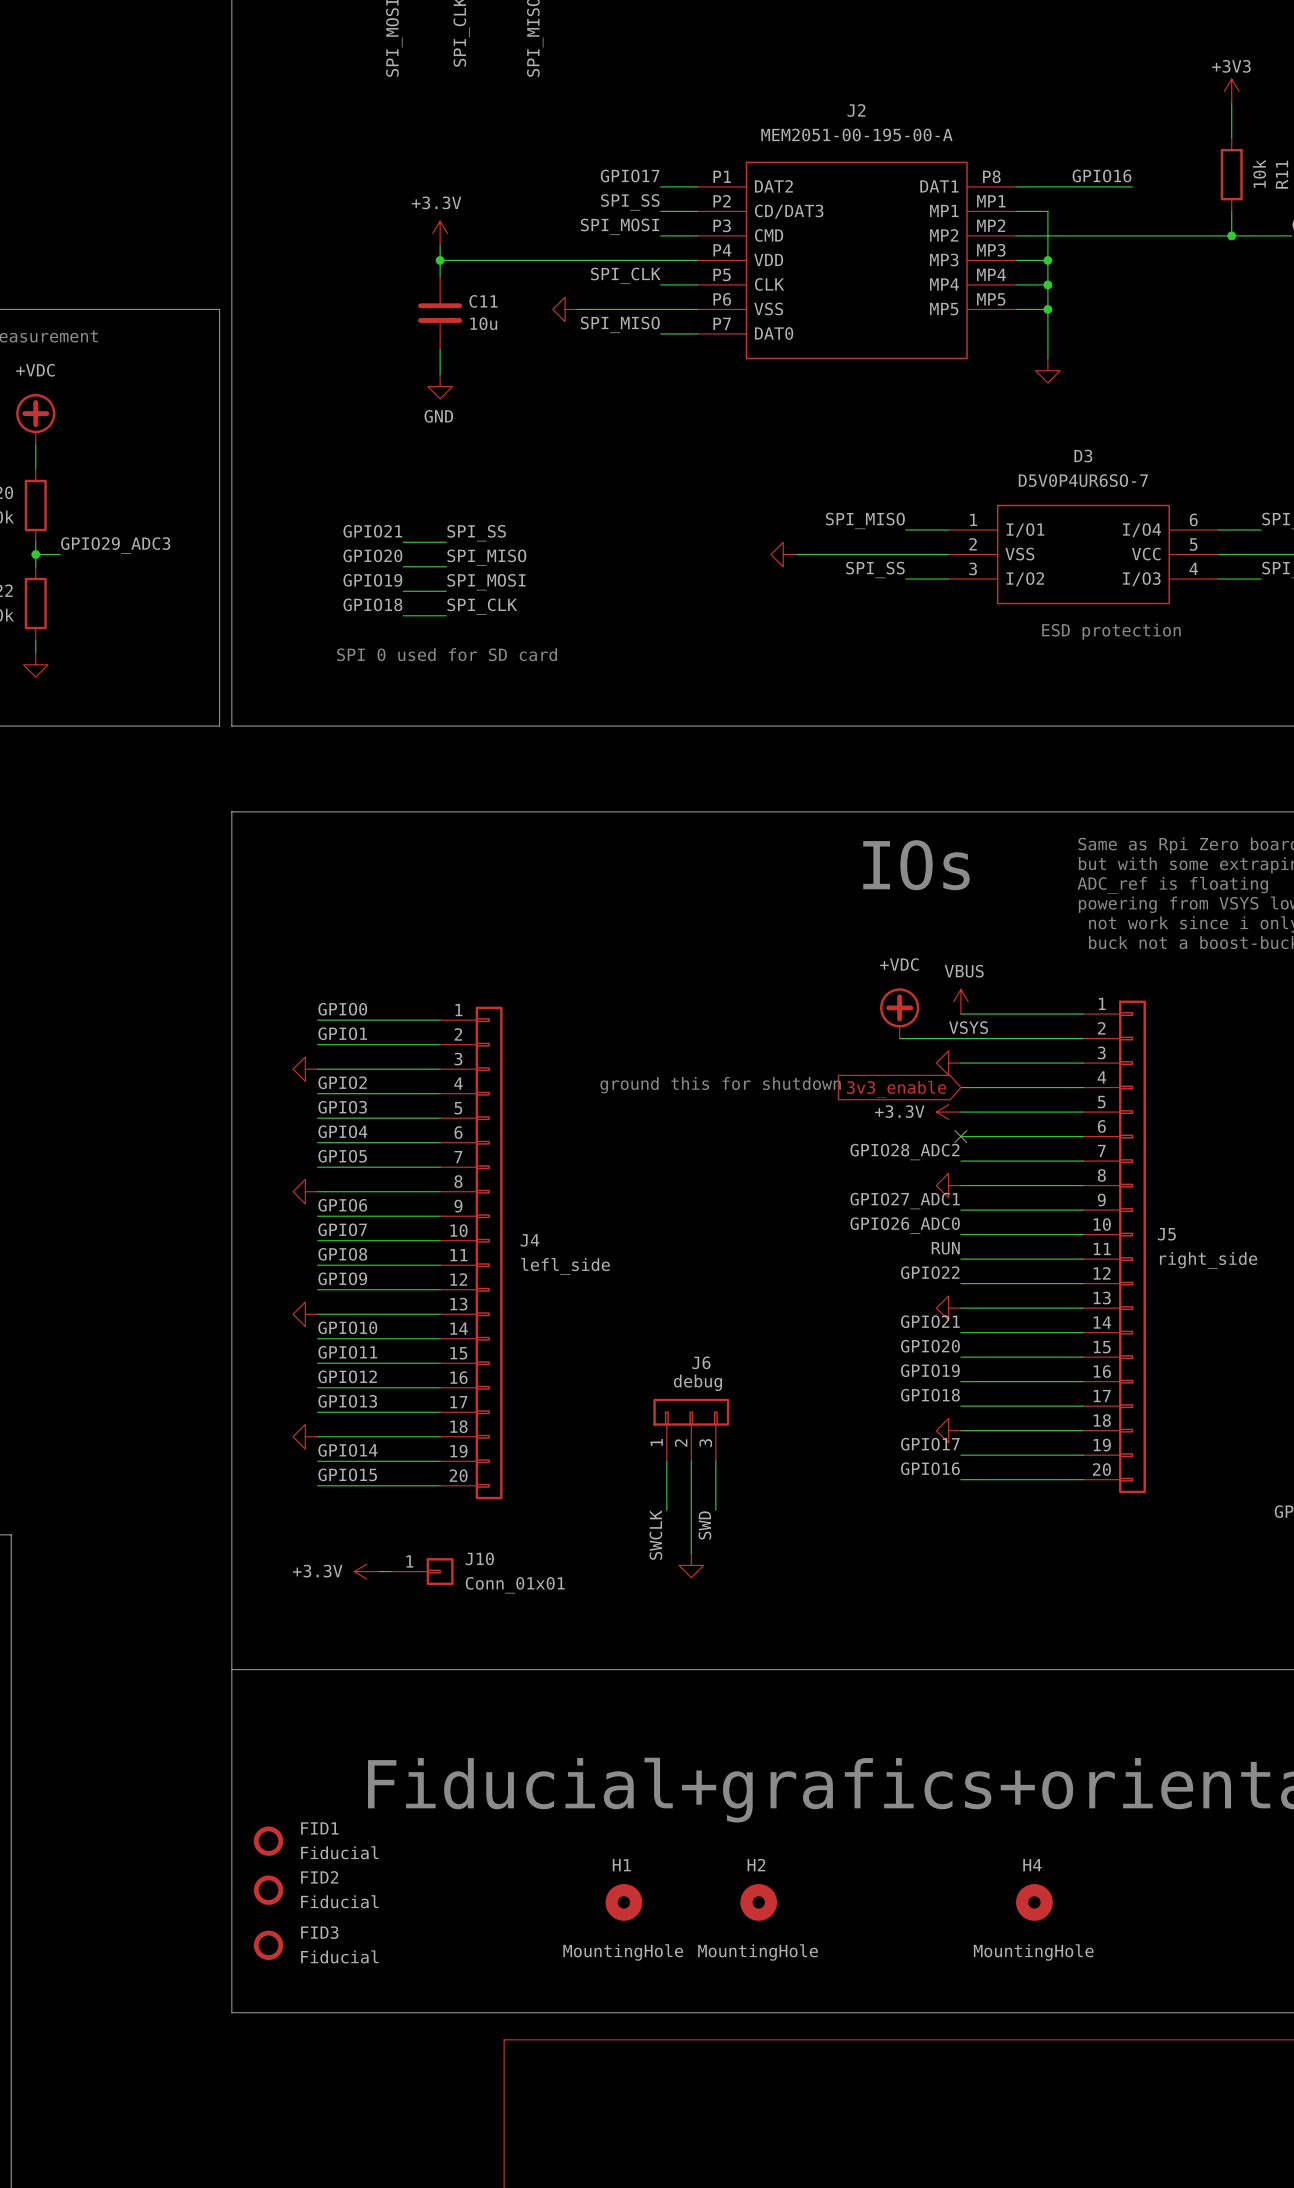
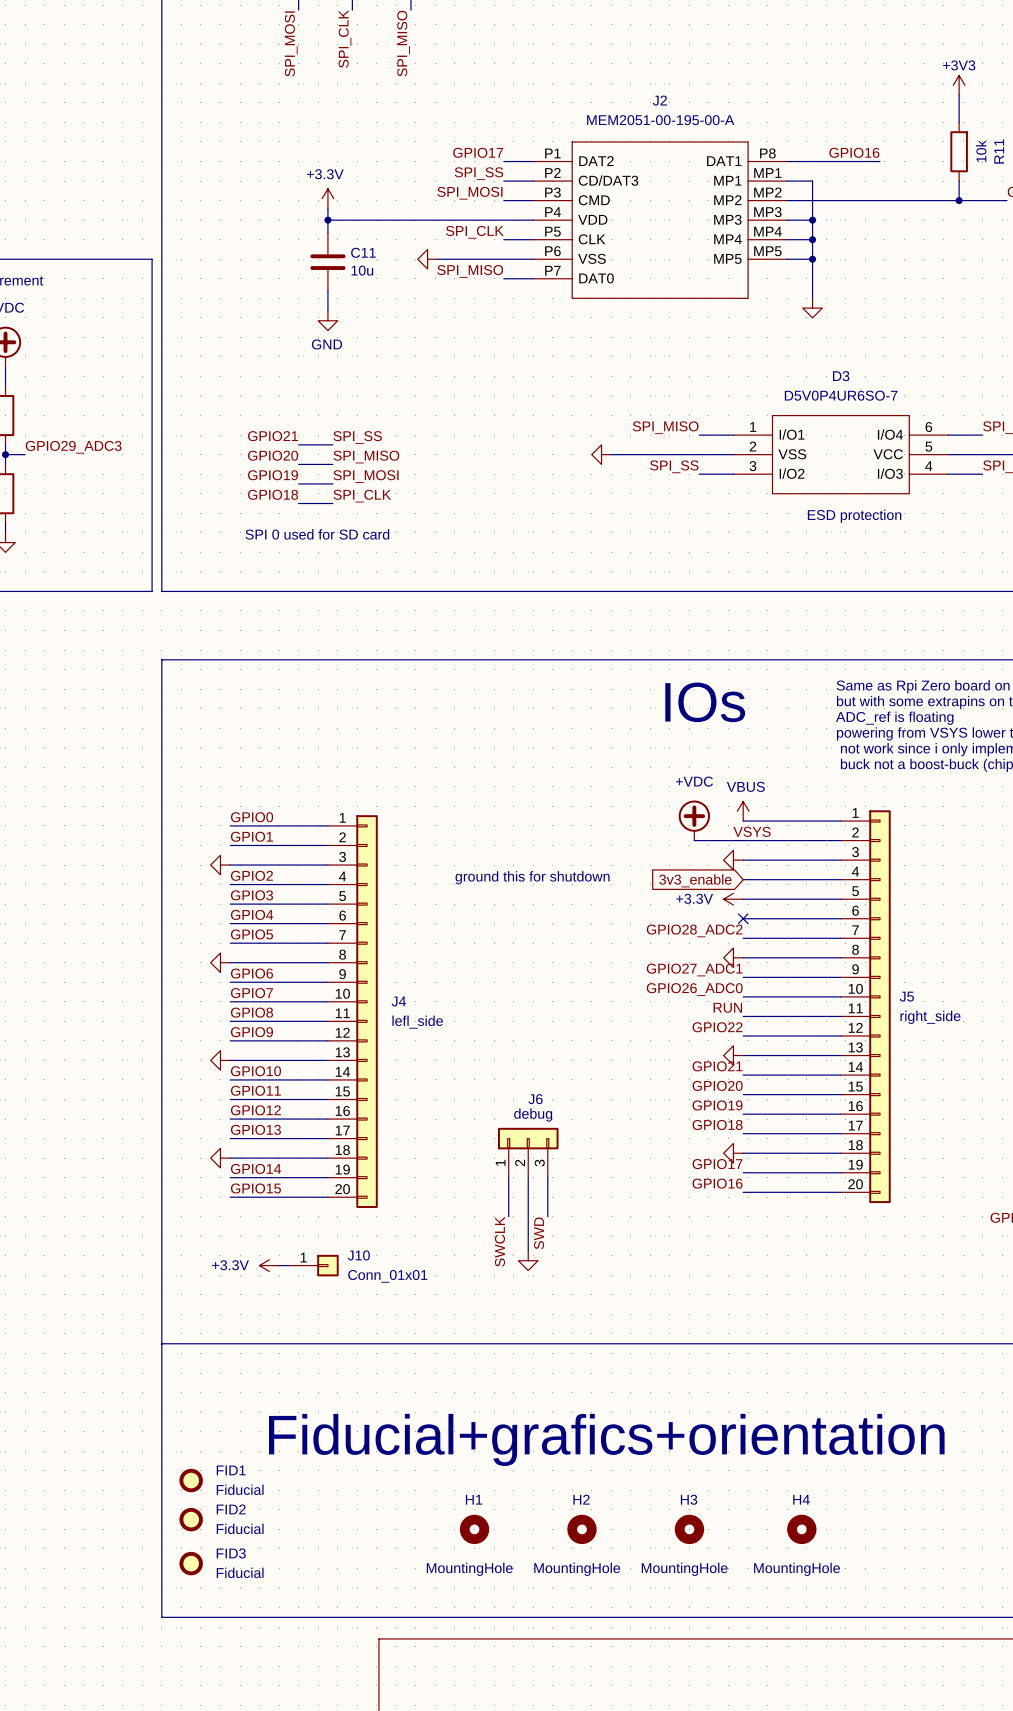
H3: none -> MountingHole (689, 1529)

